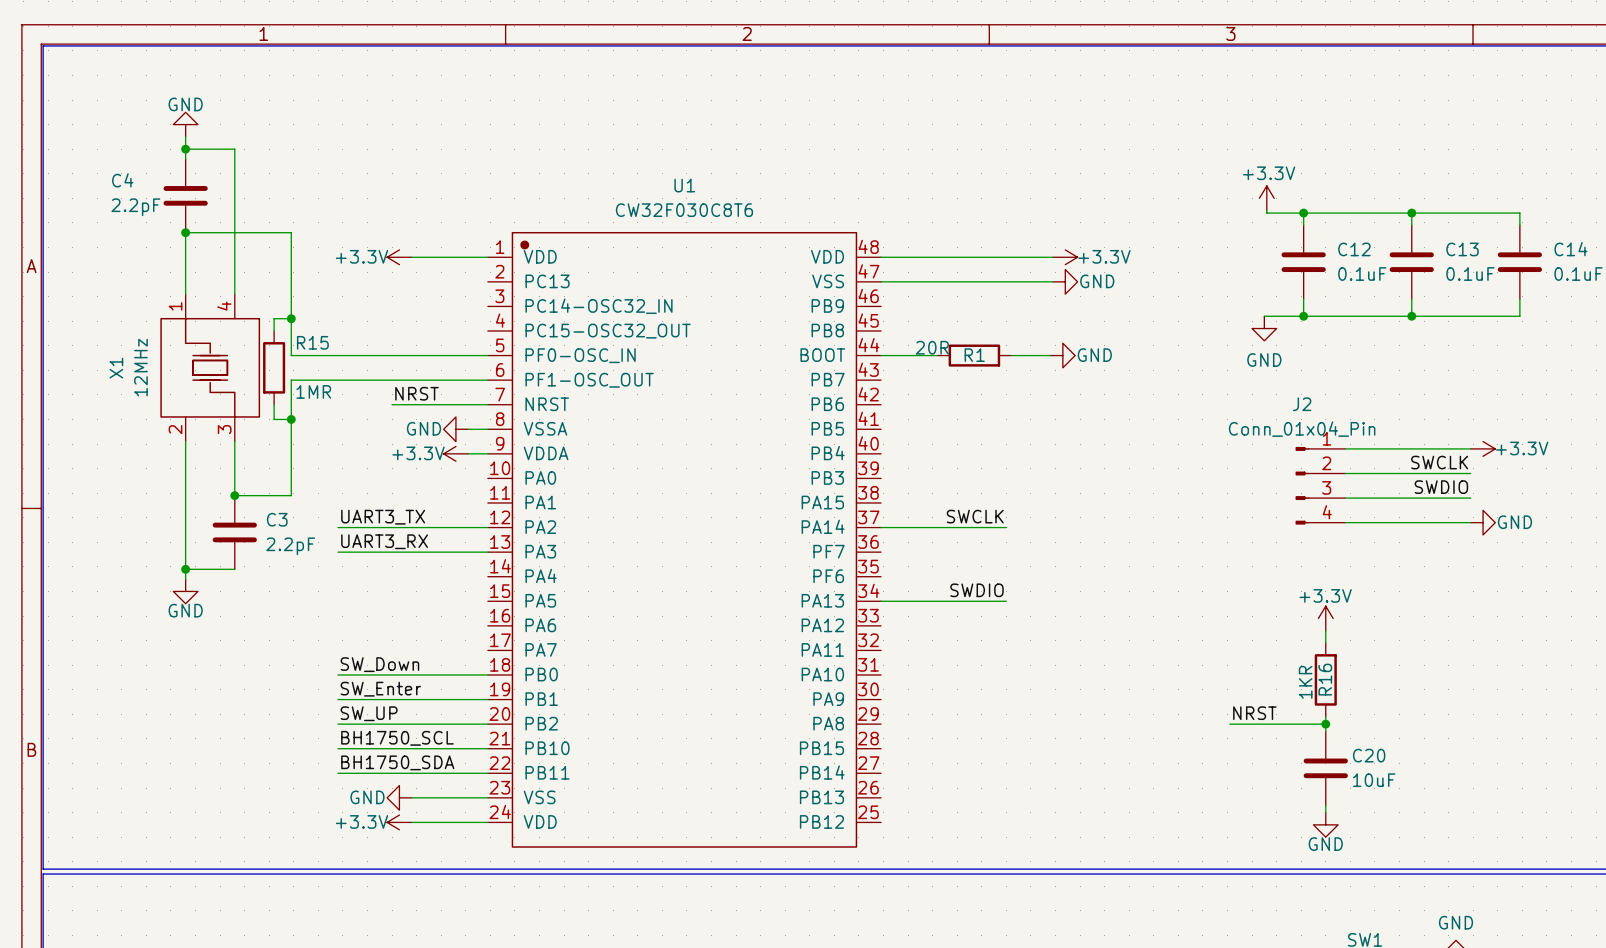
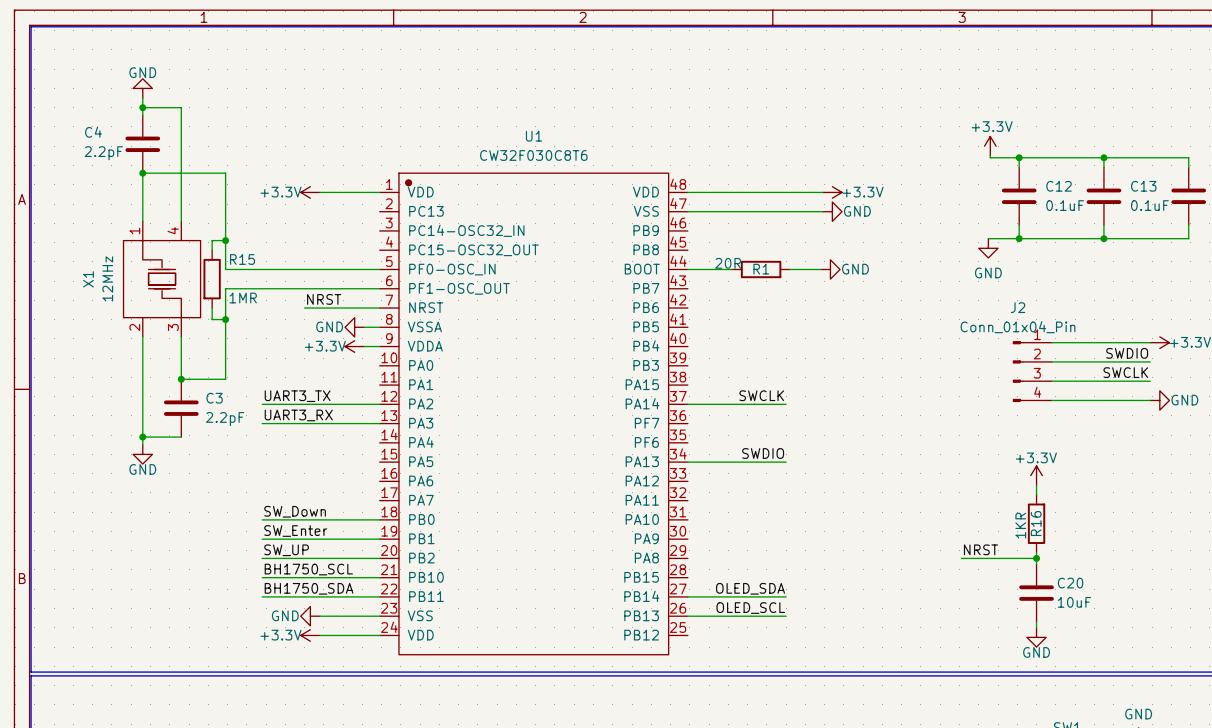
label: SWCLK (1439, 462) -> SWDIO (1127, 353)
label: SWDIO (1441, 487) -> SWCLK (1125, 372)
label: none -> OLED_SDA (750, 588)
wire: none -> (687, 596) (786, 596)
label: none -> OLED_SCL (750, 608)
wire: none -> (687, 616) (786, 616)

